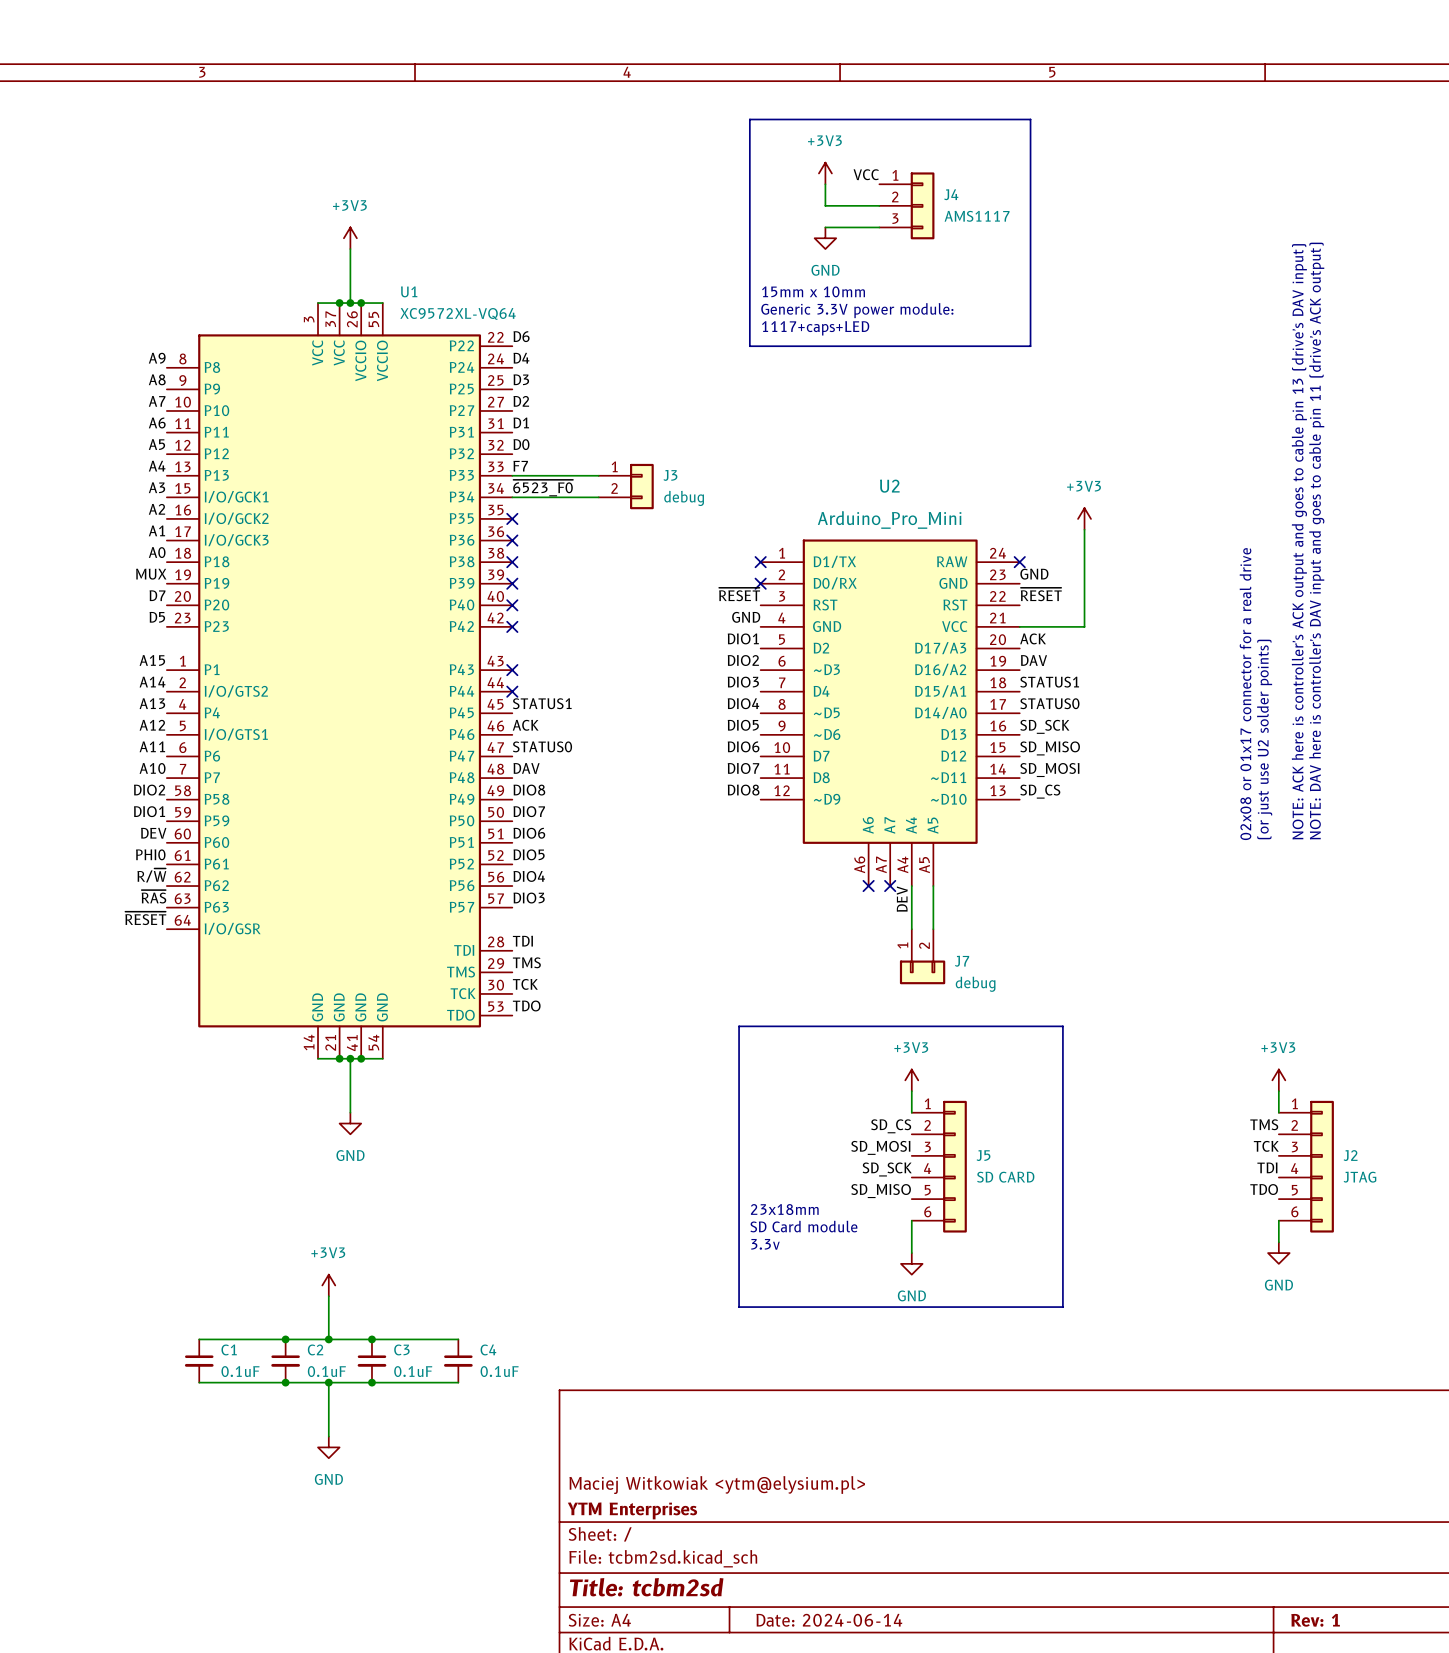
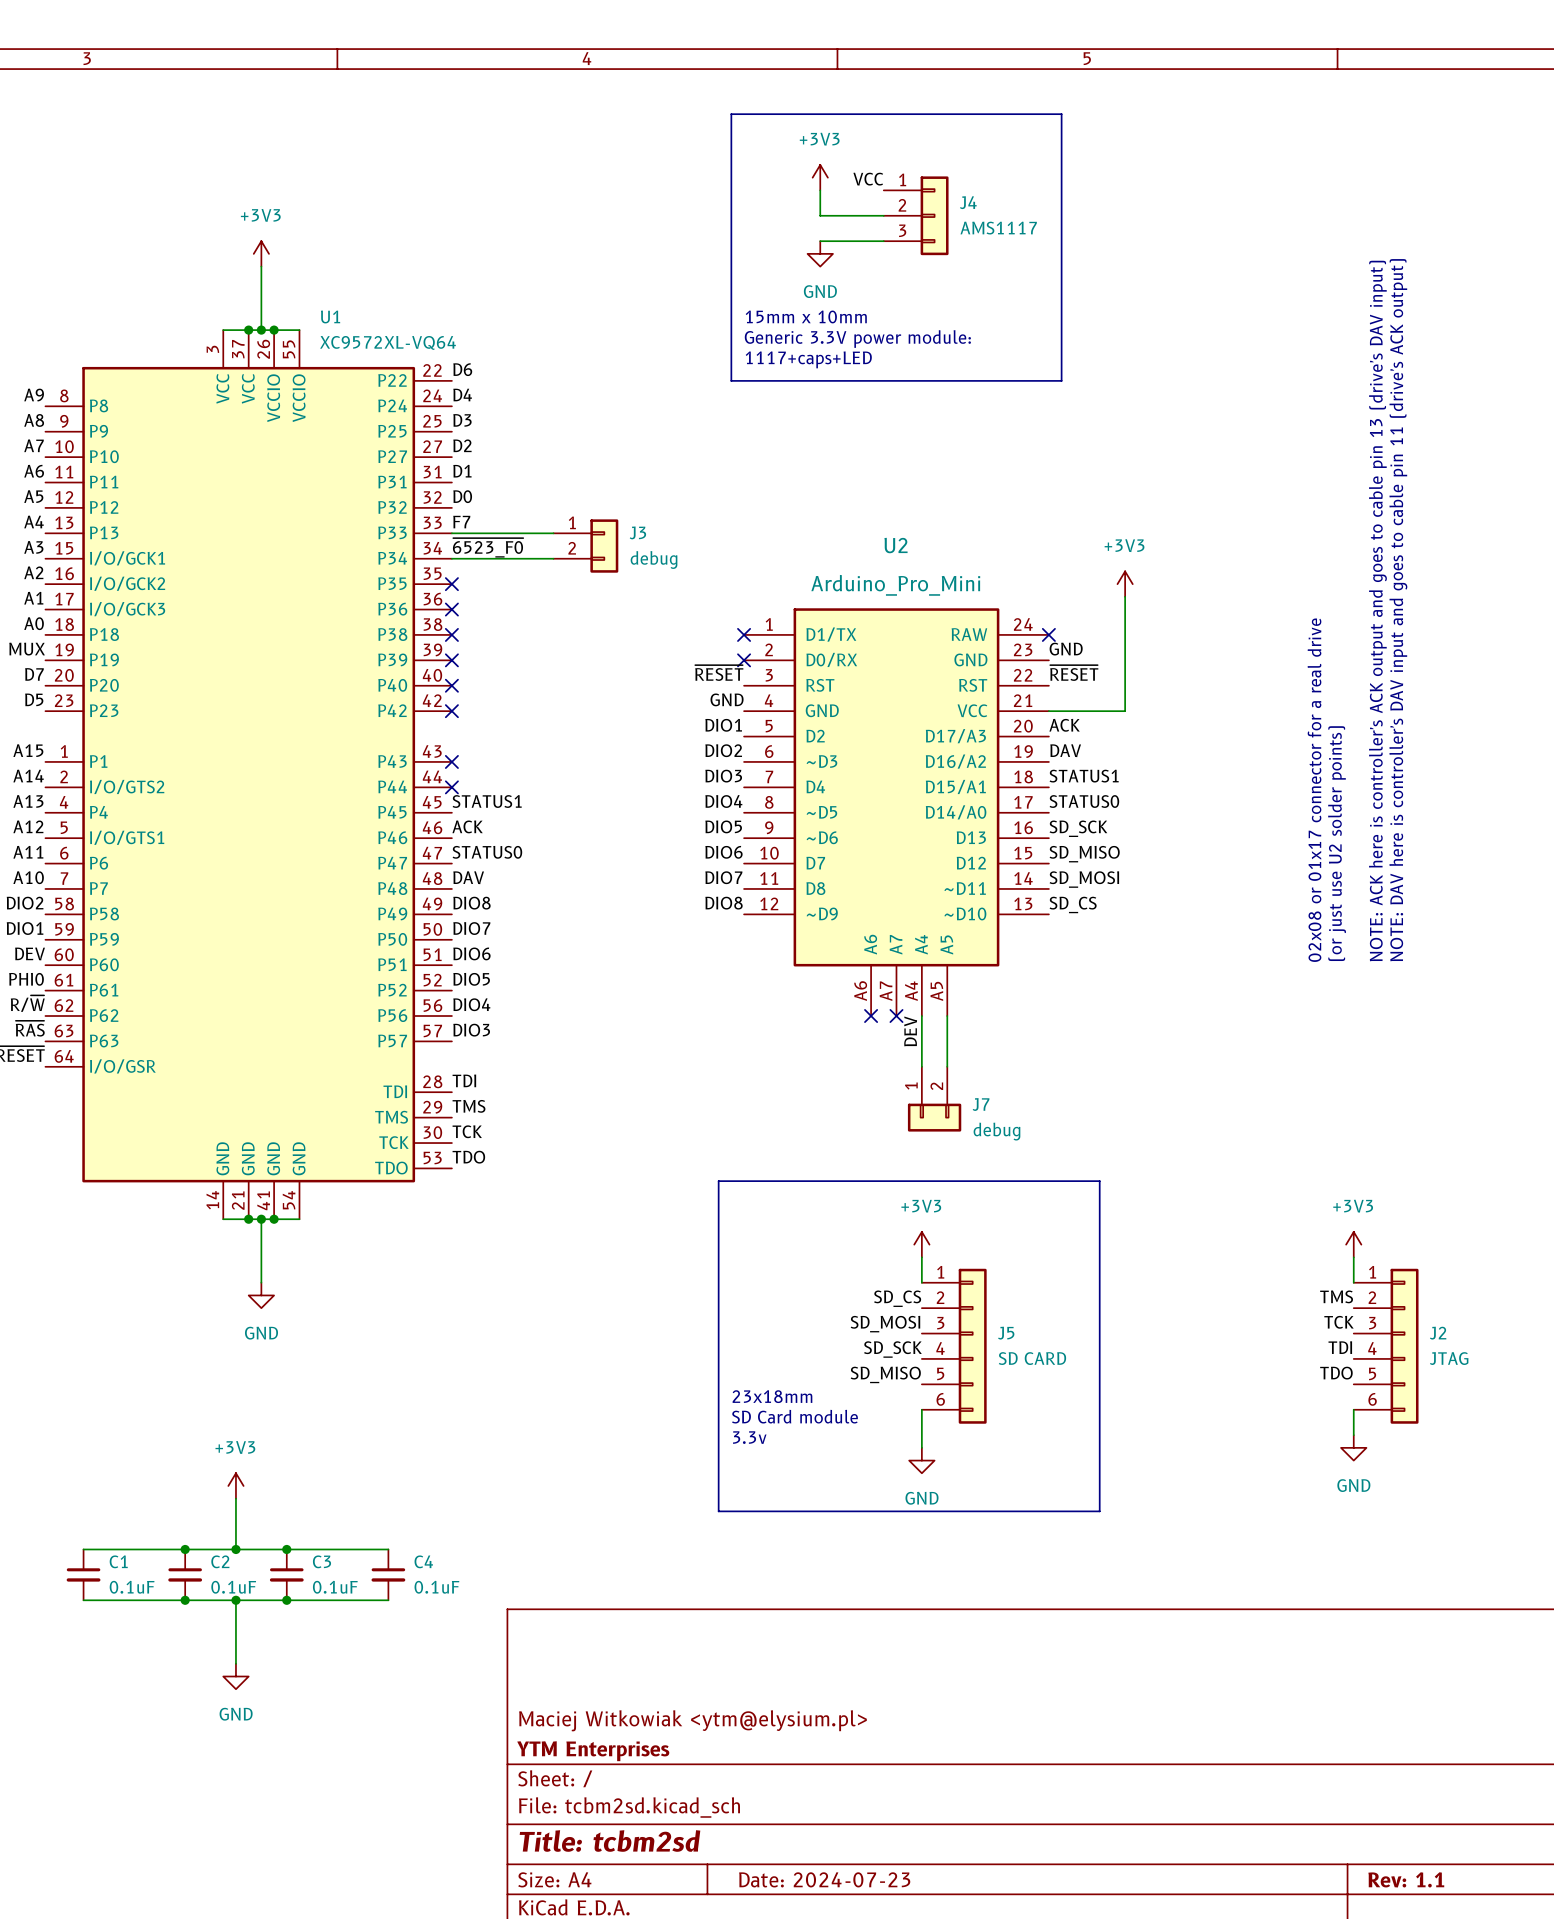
title block: Date: 2024-06-14 (829, 1620) -> Date: 2024-07-23 (824, 1879)
title block: Rev: 1 (1315, 1620) -> Rev: 1.1 (1406, 1879)

